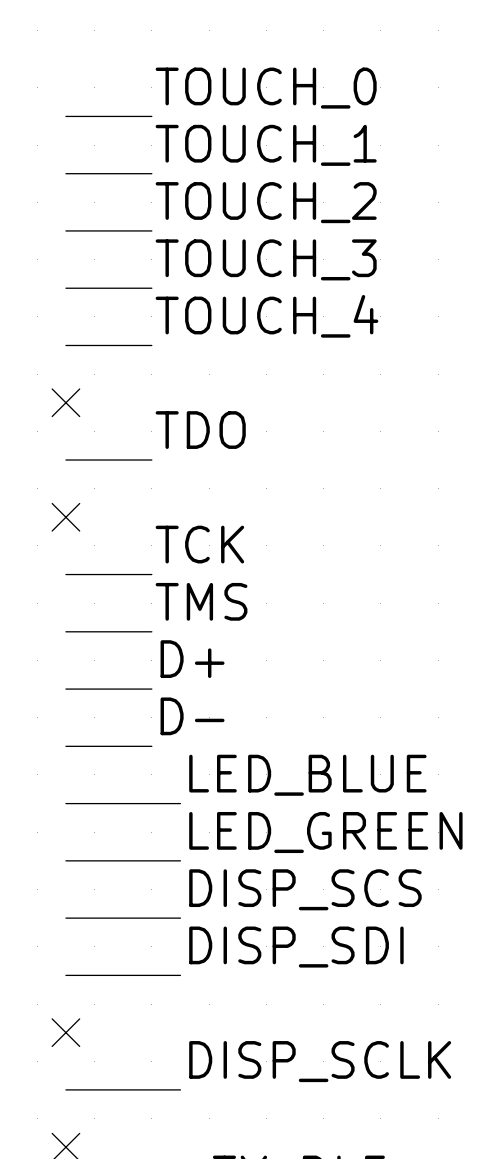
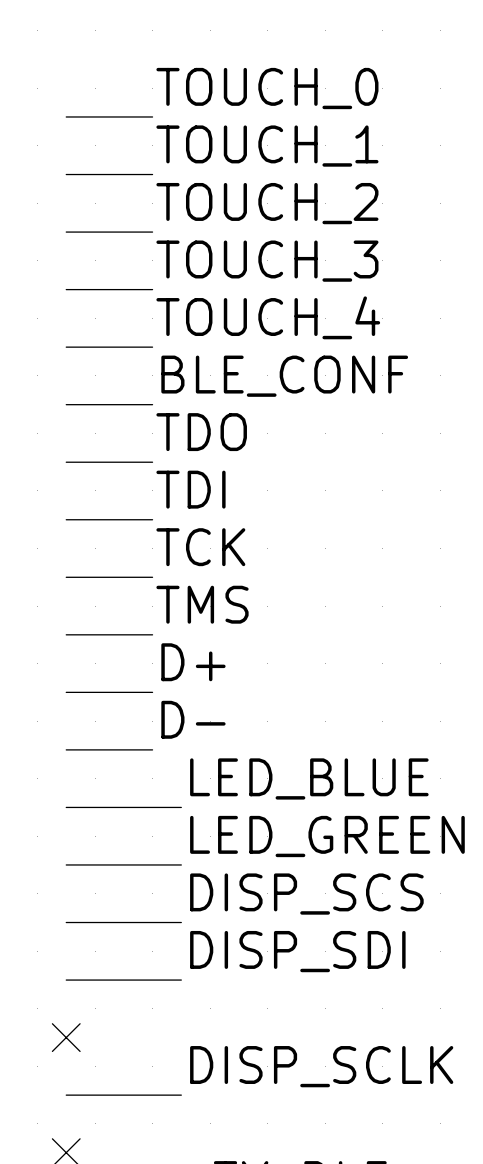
label: none -> BLE_CONF (284, 376)
wire: none -> (66, 404) (152, 404)
no-connect mark: (65, 402) -> none
label: none -> TDI (190, 489)
wire: none -> (66, 519) (152, 519)
no-connect mark: (65, 517) -> none

